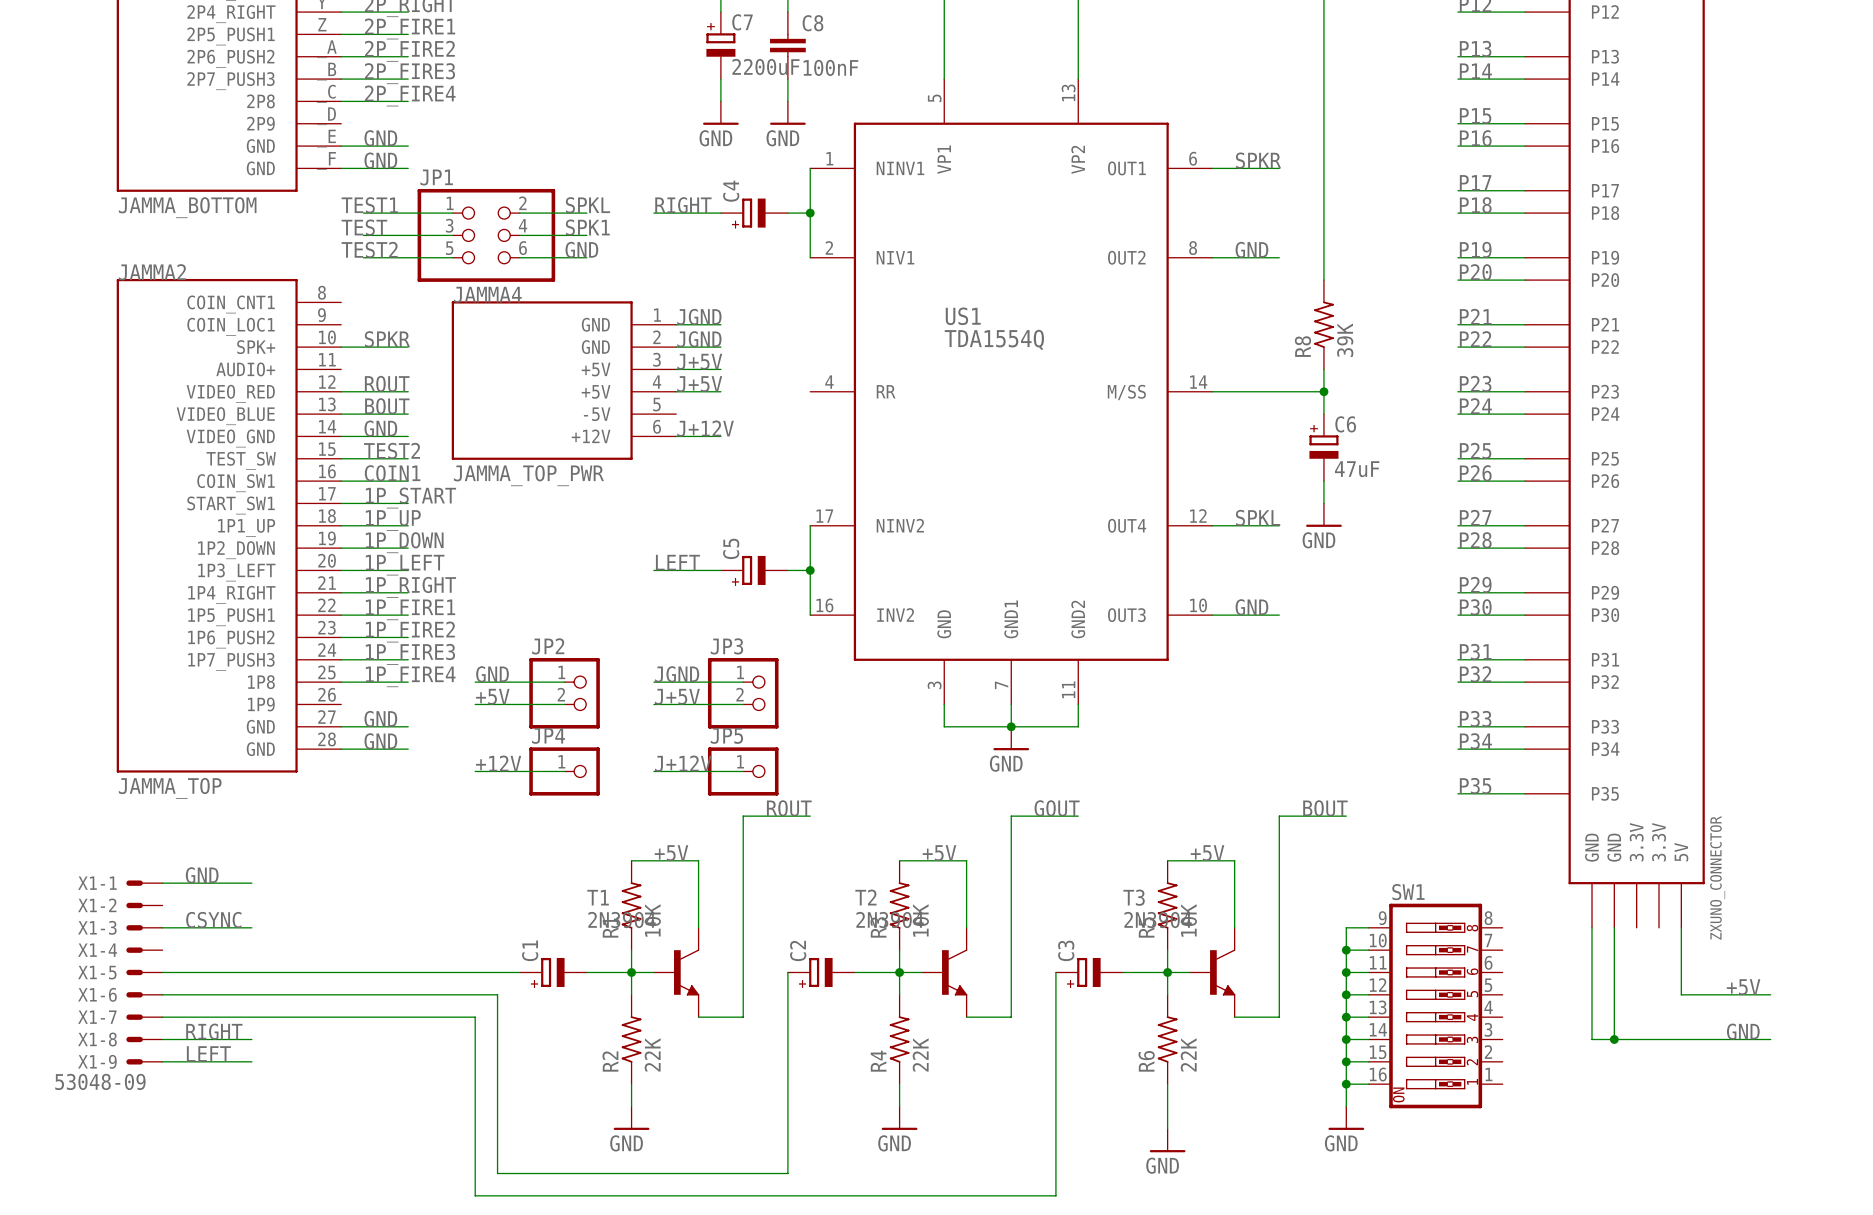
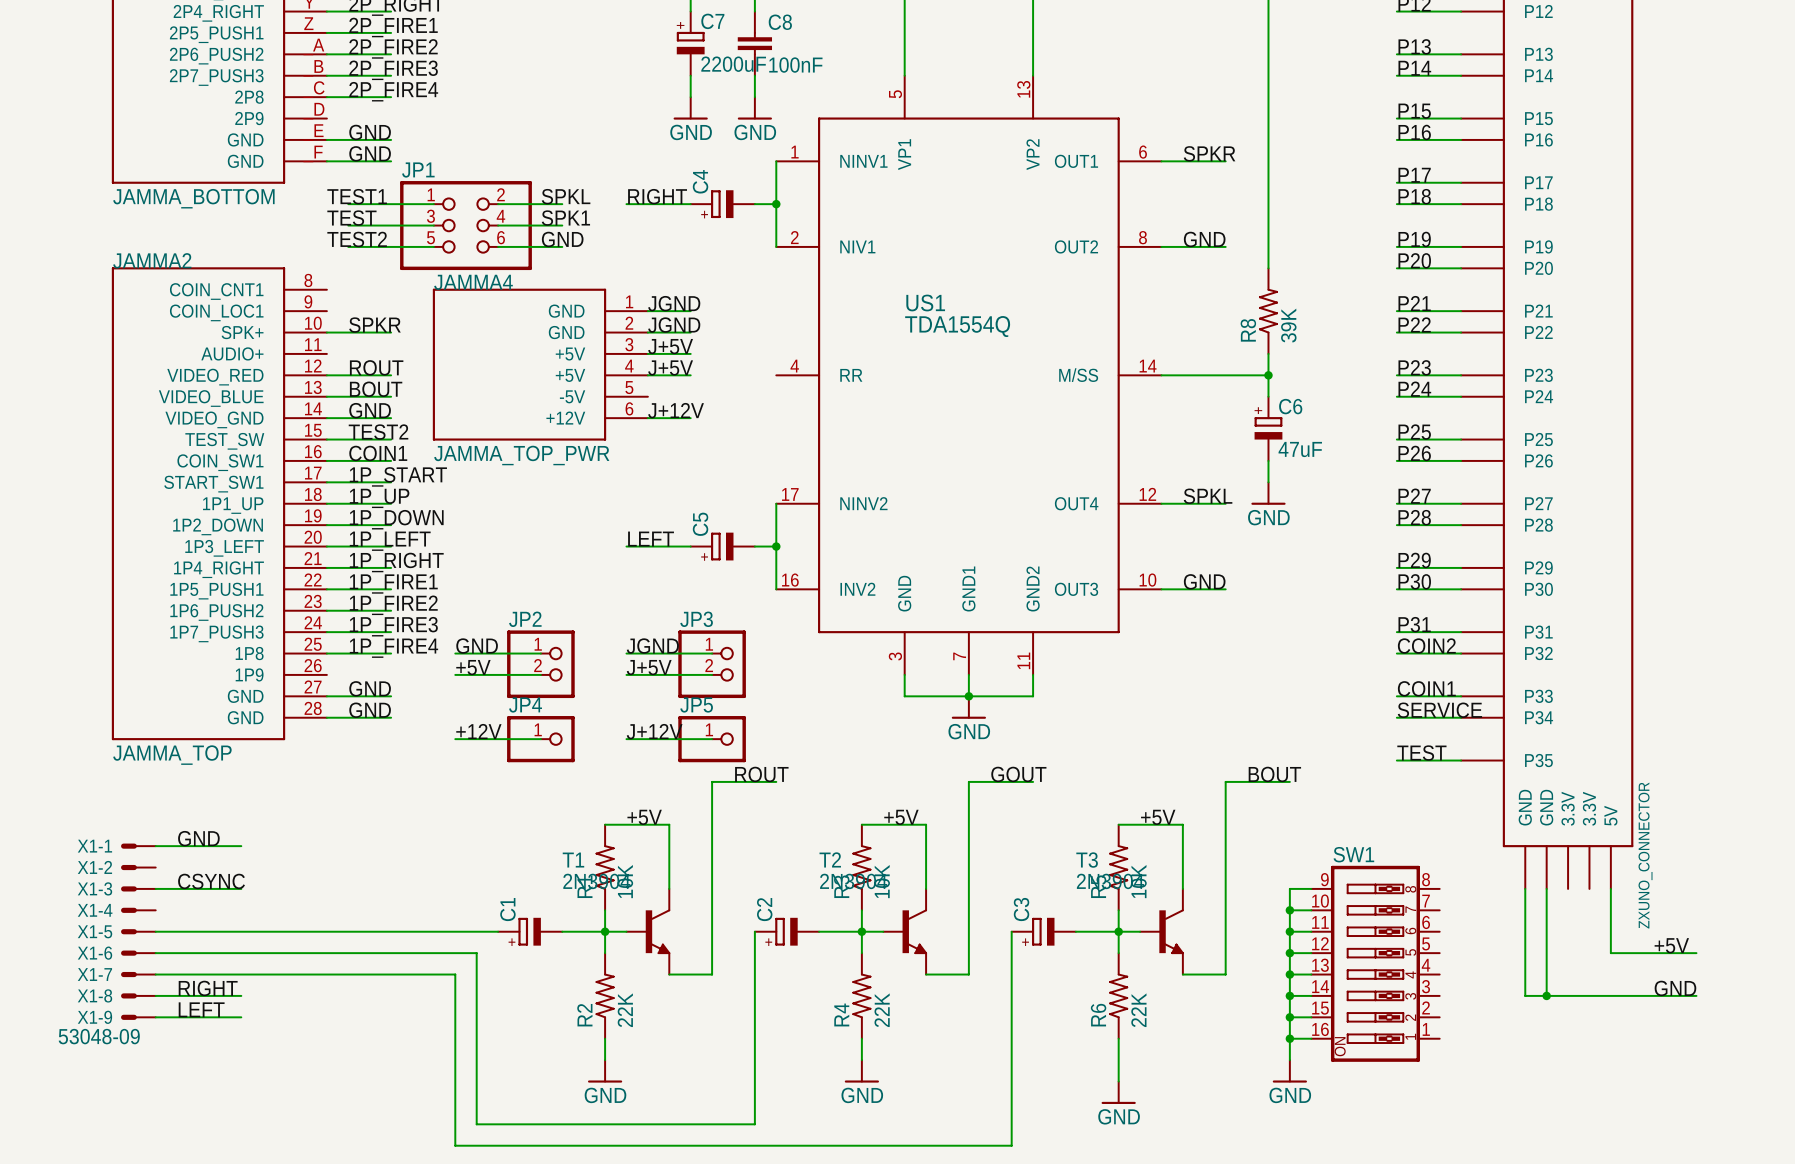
label: P32 (1475, 674) -> COIN2 (1426, 646)
label: P33 (1475, 718) -> COIN1 (1426, 688)
label: P34 (1475, 741) -> SERVICE (1439, 710)
label: P35 (1475, 786) -> TEST (1421, 753)

